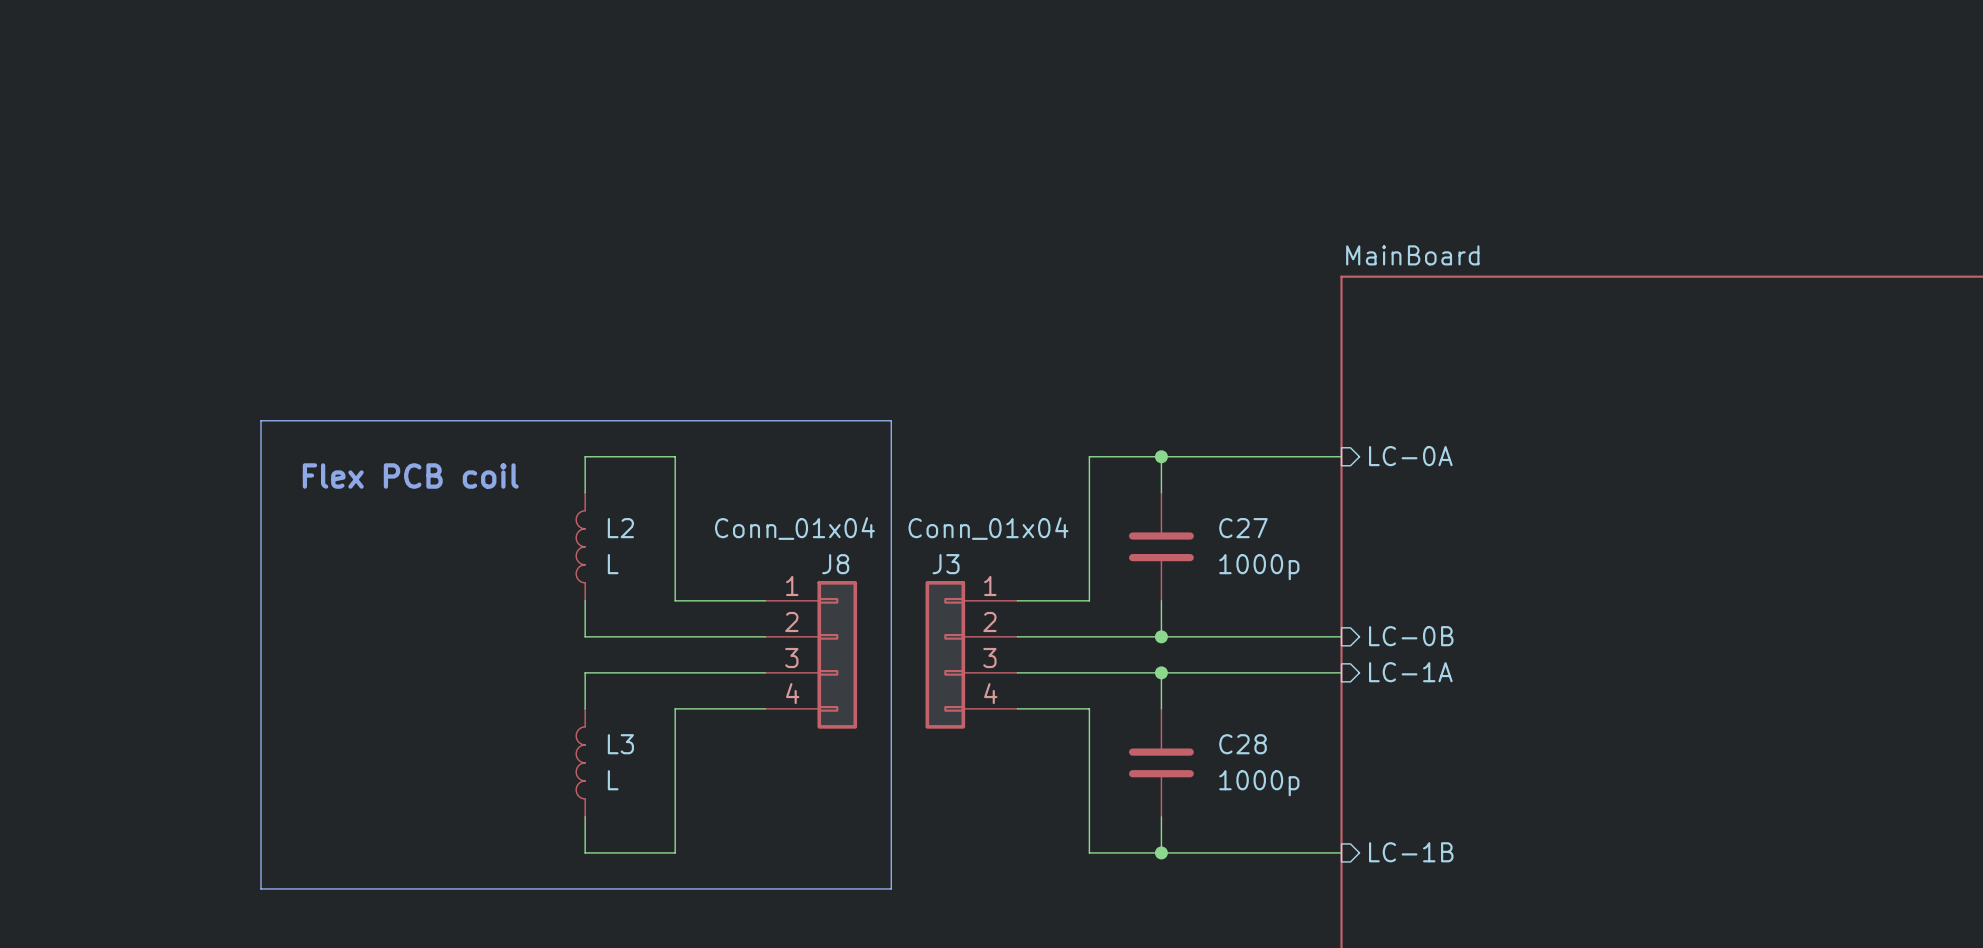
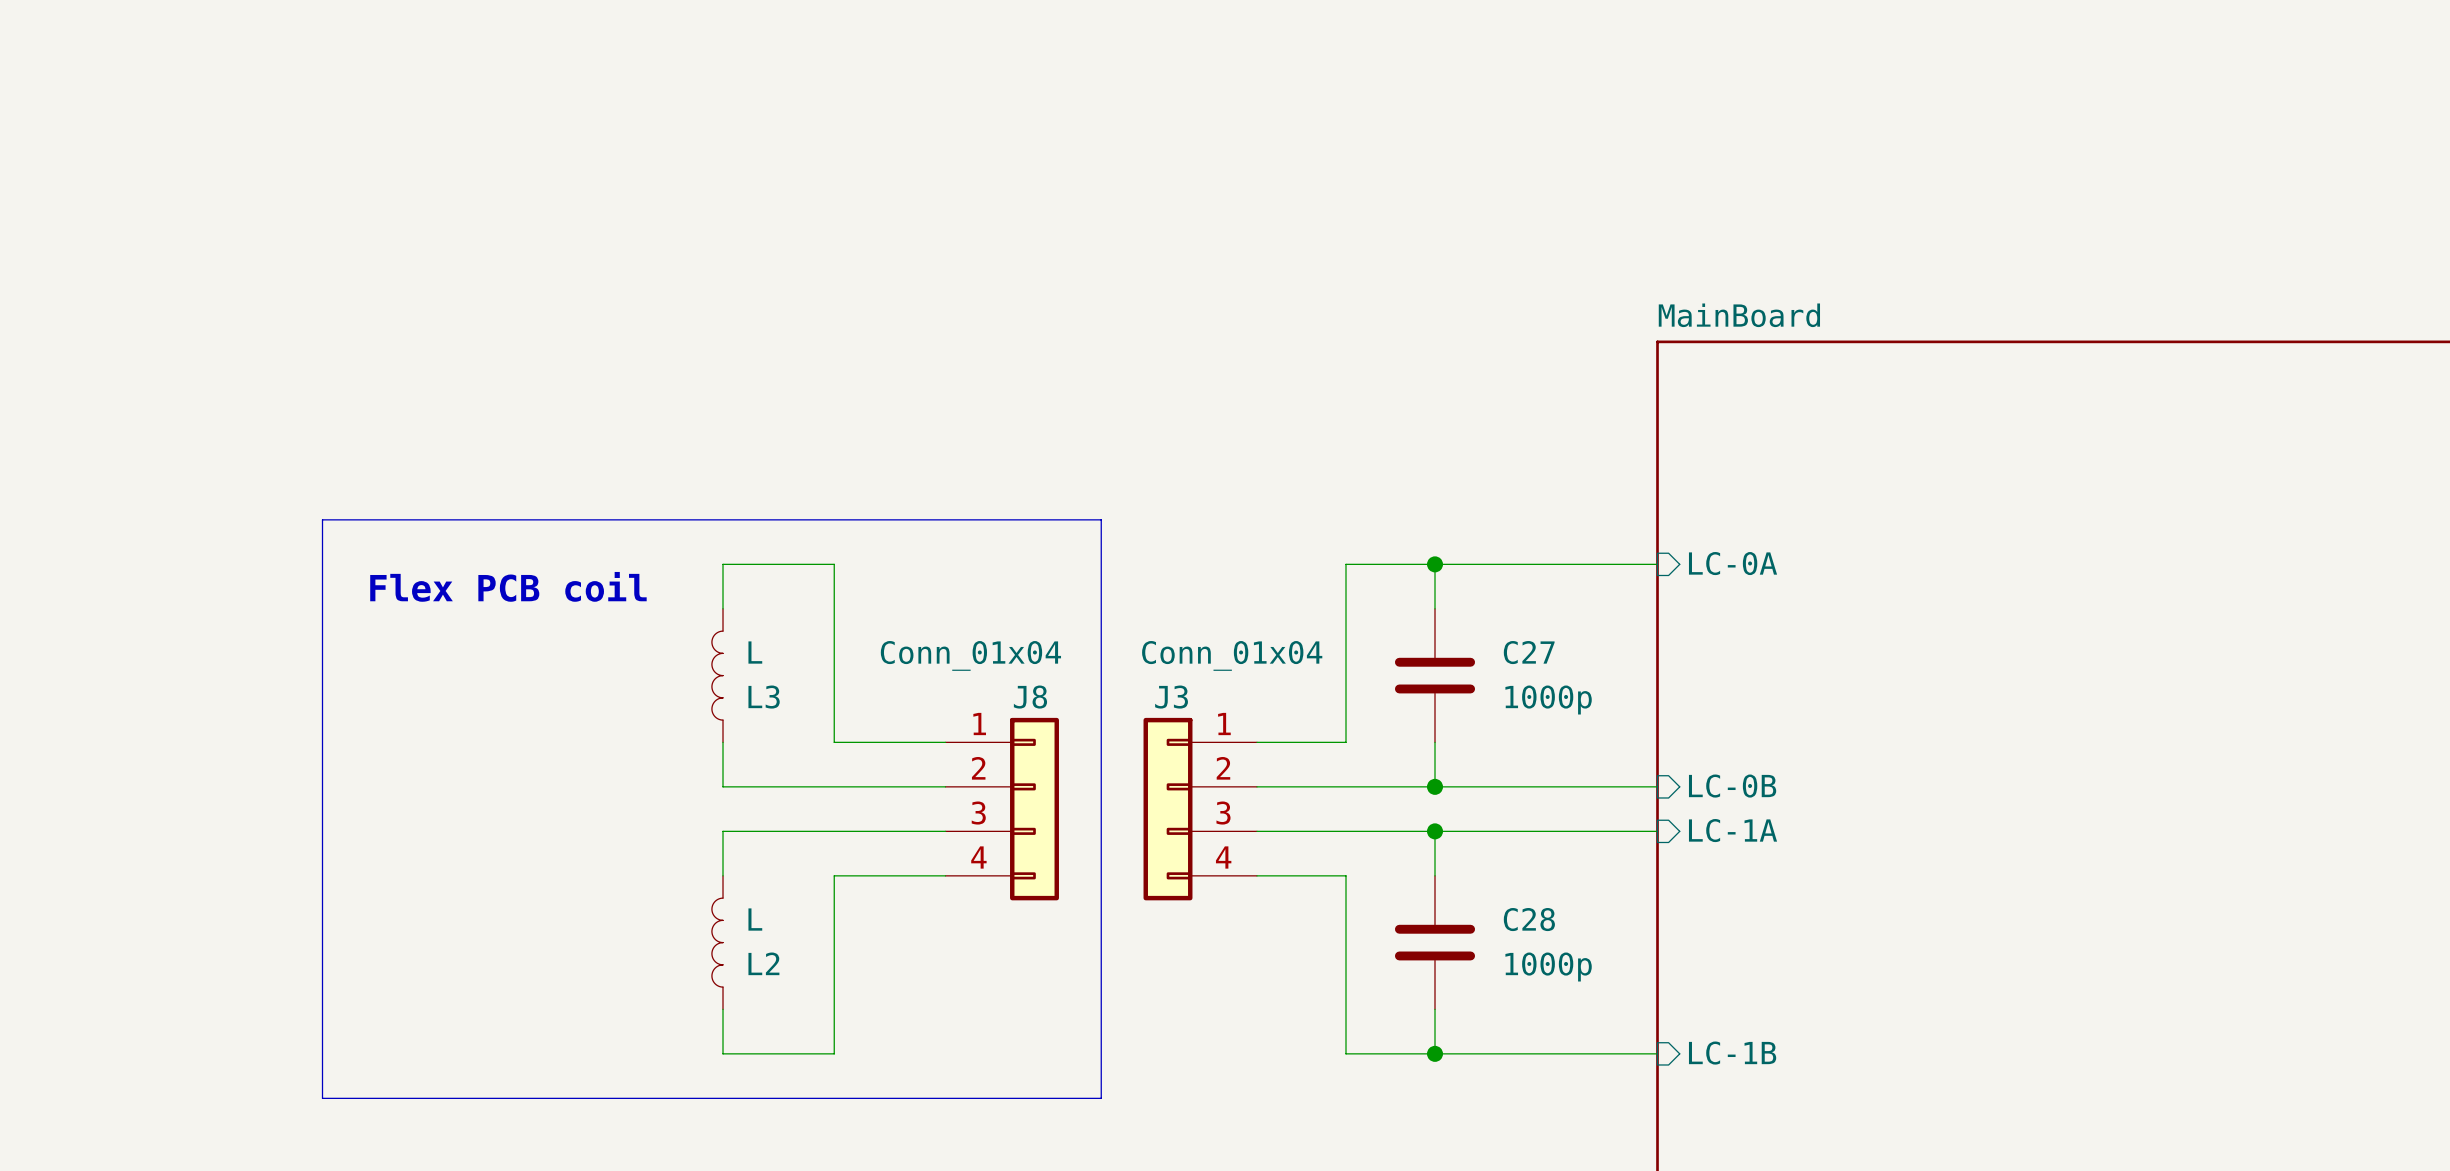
L2 name: L2 (620, 528) -> L3 (764, 697)
L3 name: L3 (620, 744) -> L2 (763, 963)

